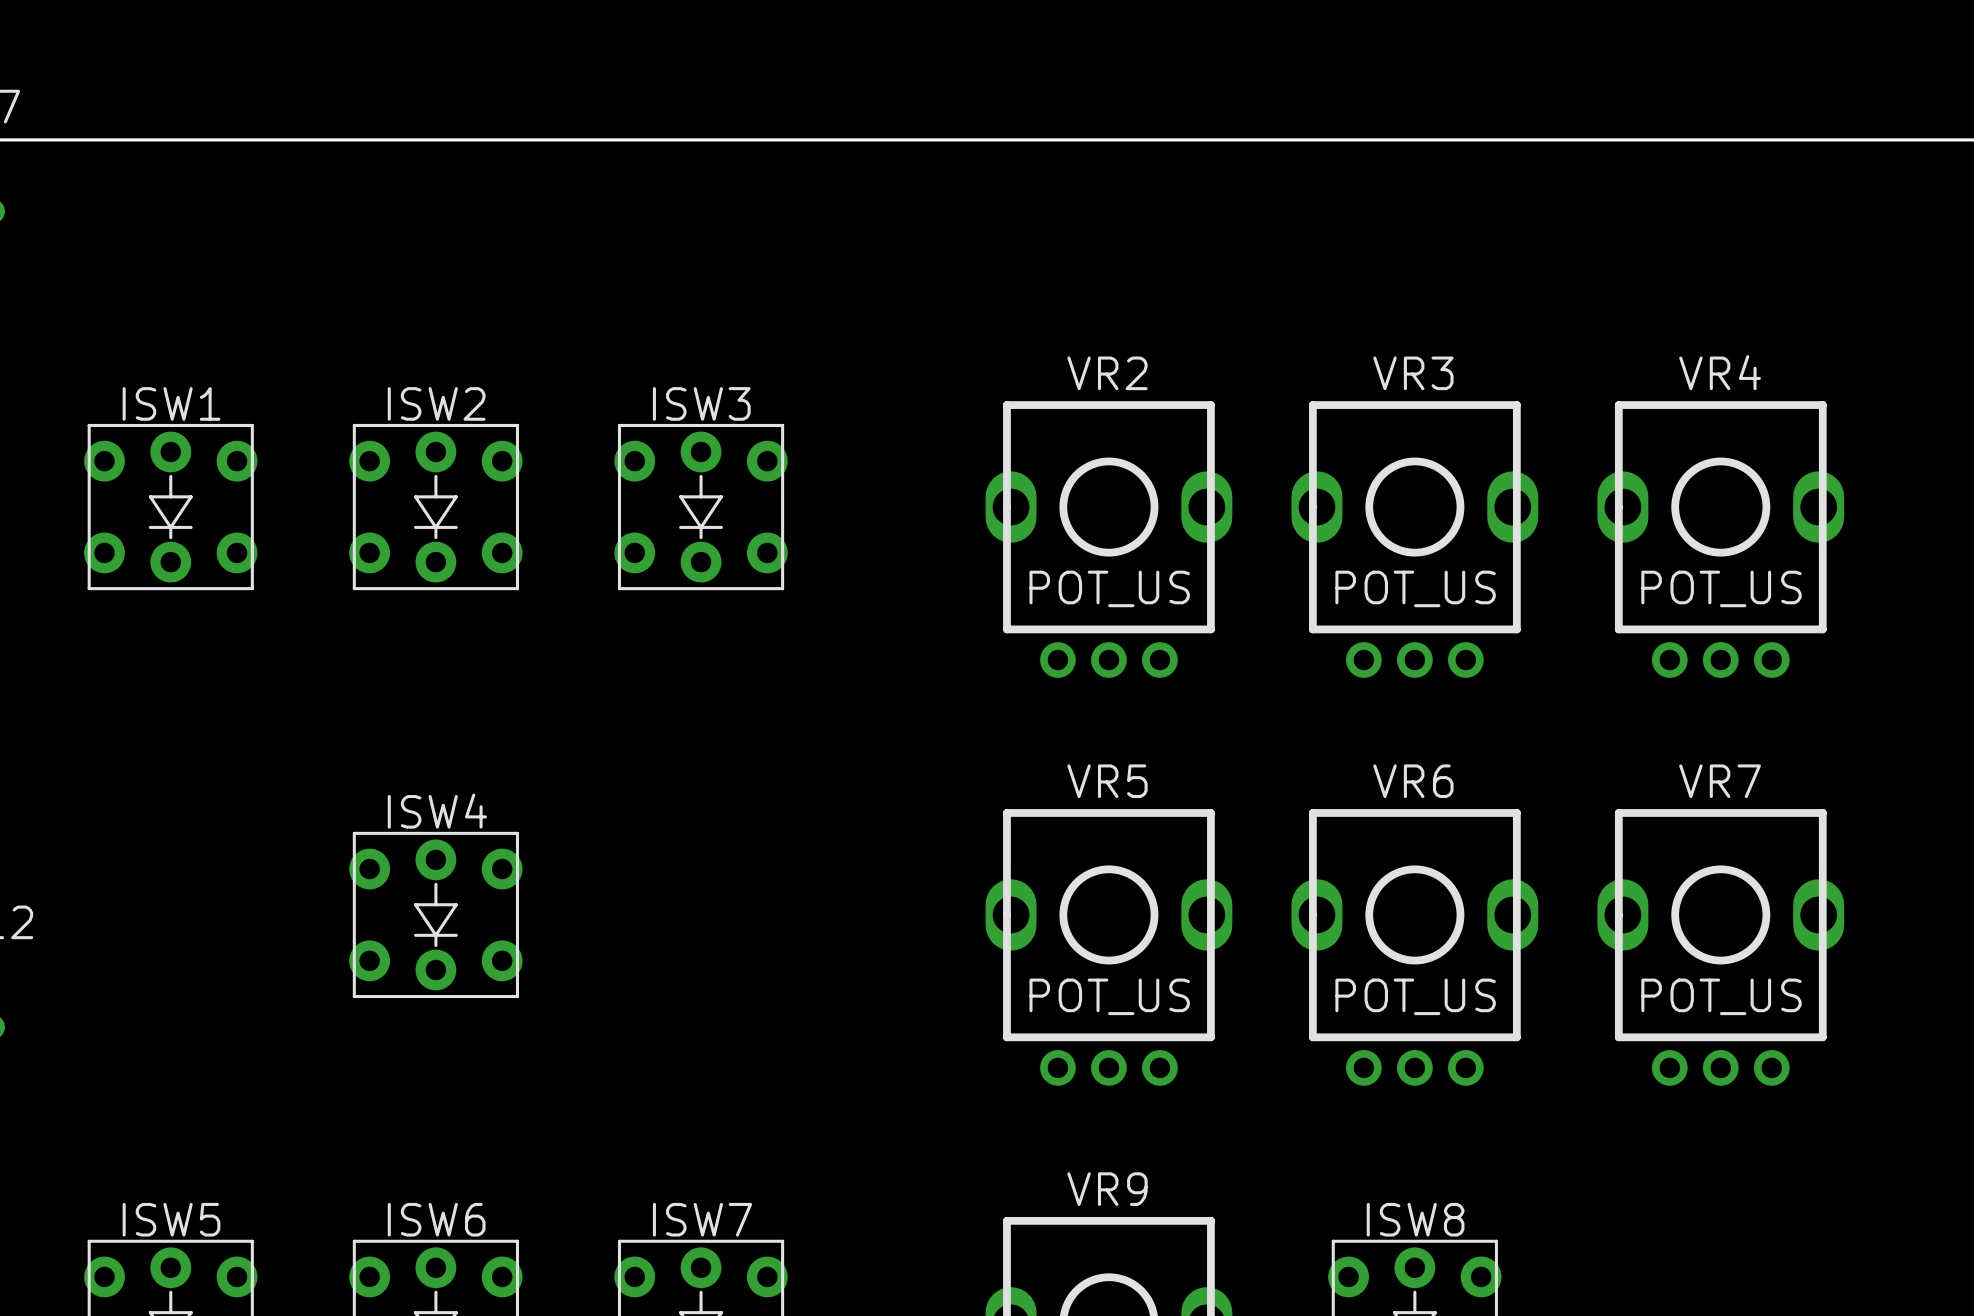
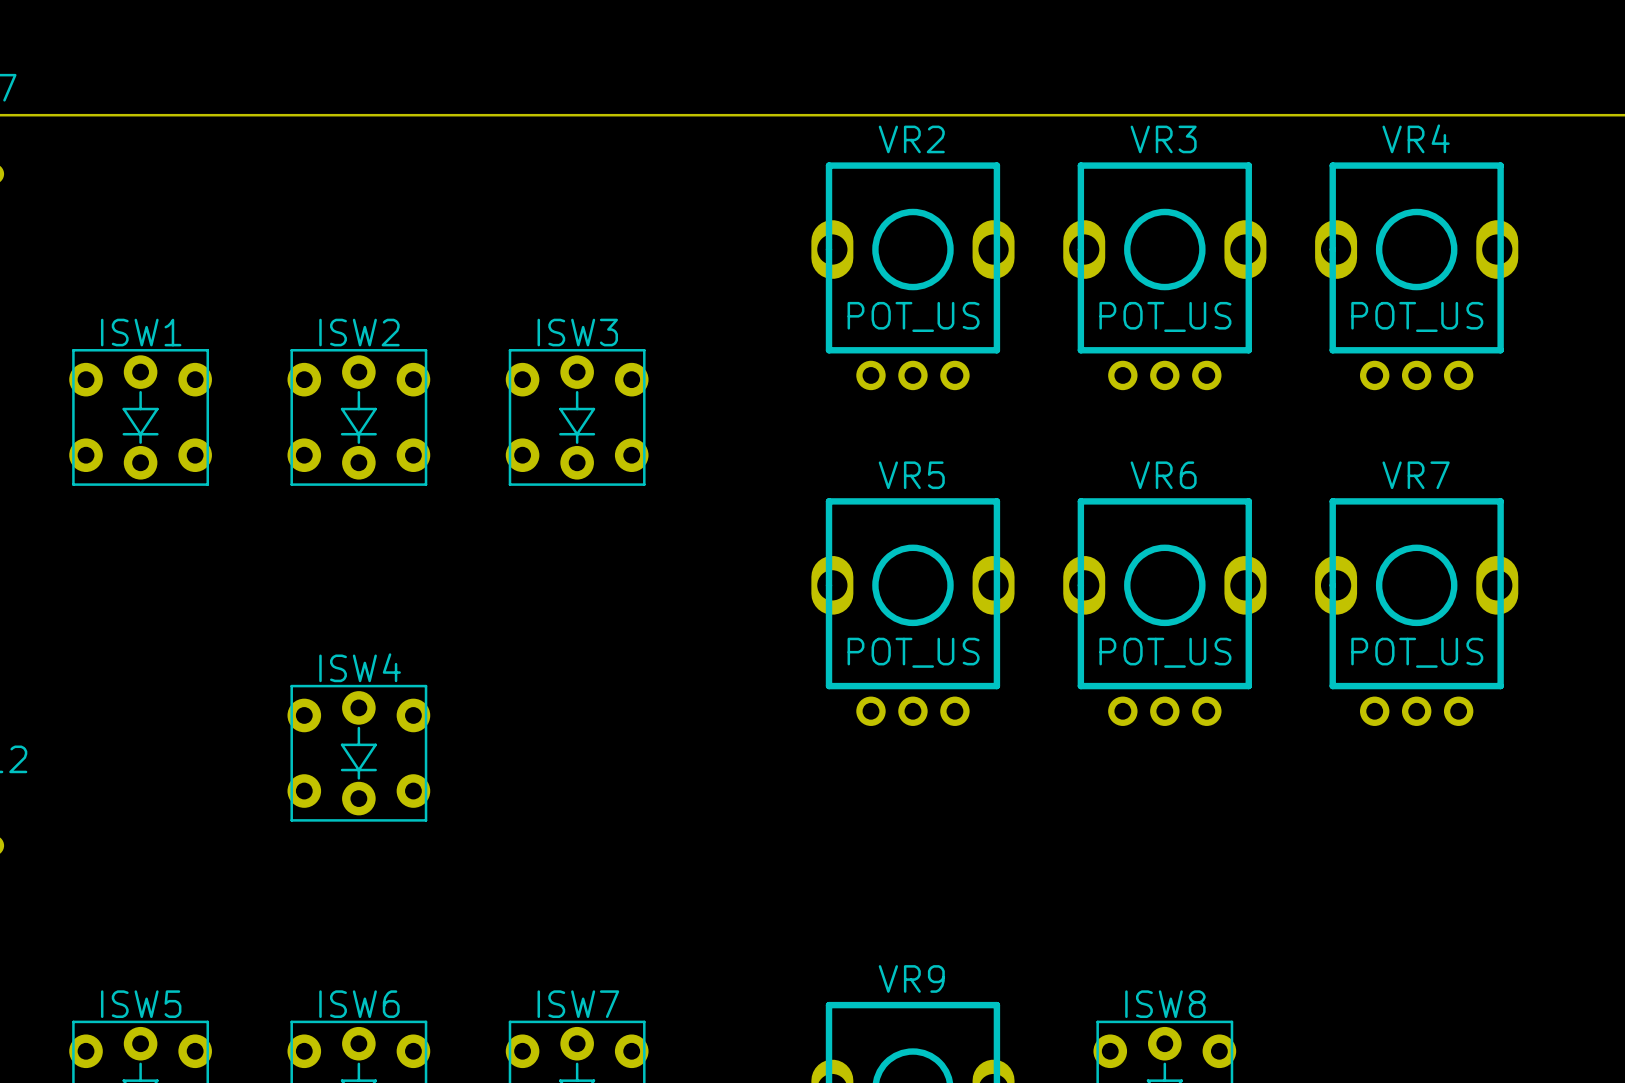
VR2 position: (1108, 539) -> (912, 276)
VR3 position: (1414, 539) -> (1164, 276)
VR4 position: (1720, 539) -> (1416, 276)
VR5 position: (1108, 947) -> (912, 612)
VR6 position: (1414, 947) -> (1164, 612)
VR7 position: (1720, 947) -> (1416, 612)

